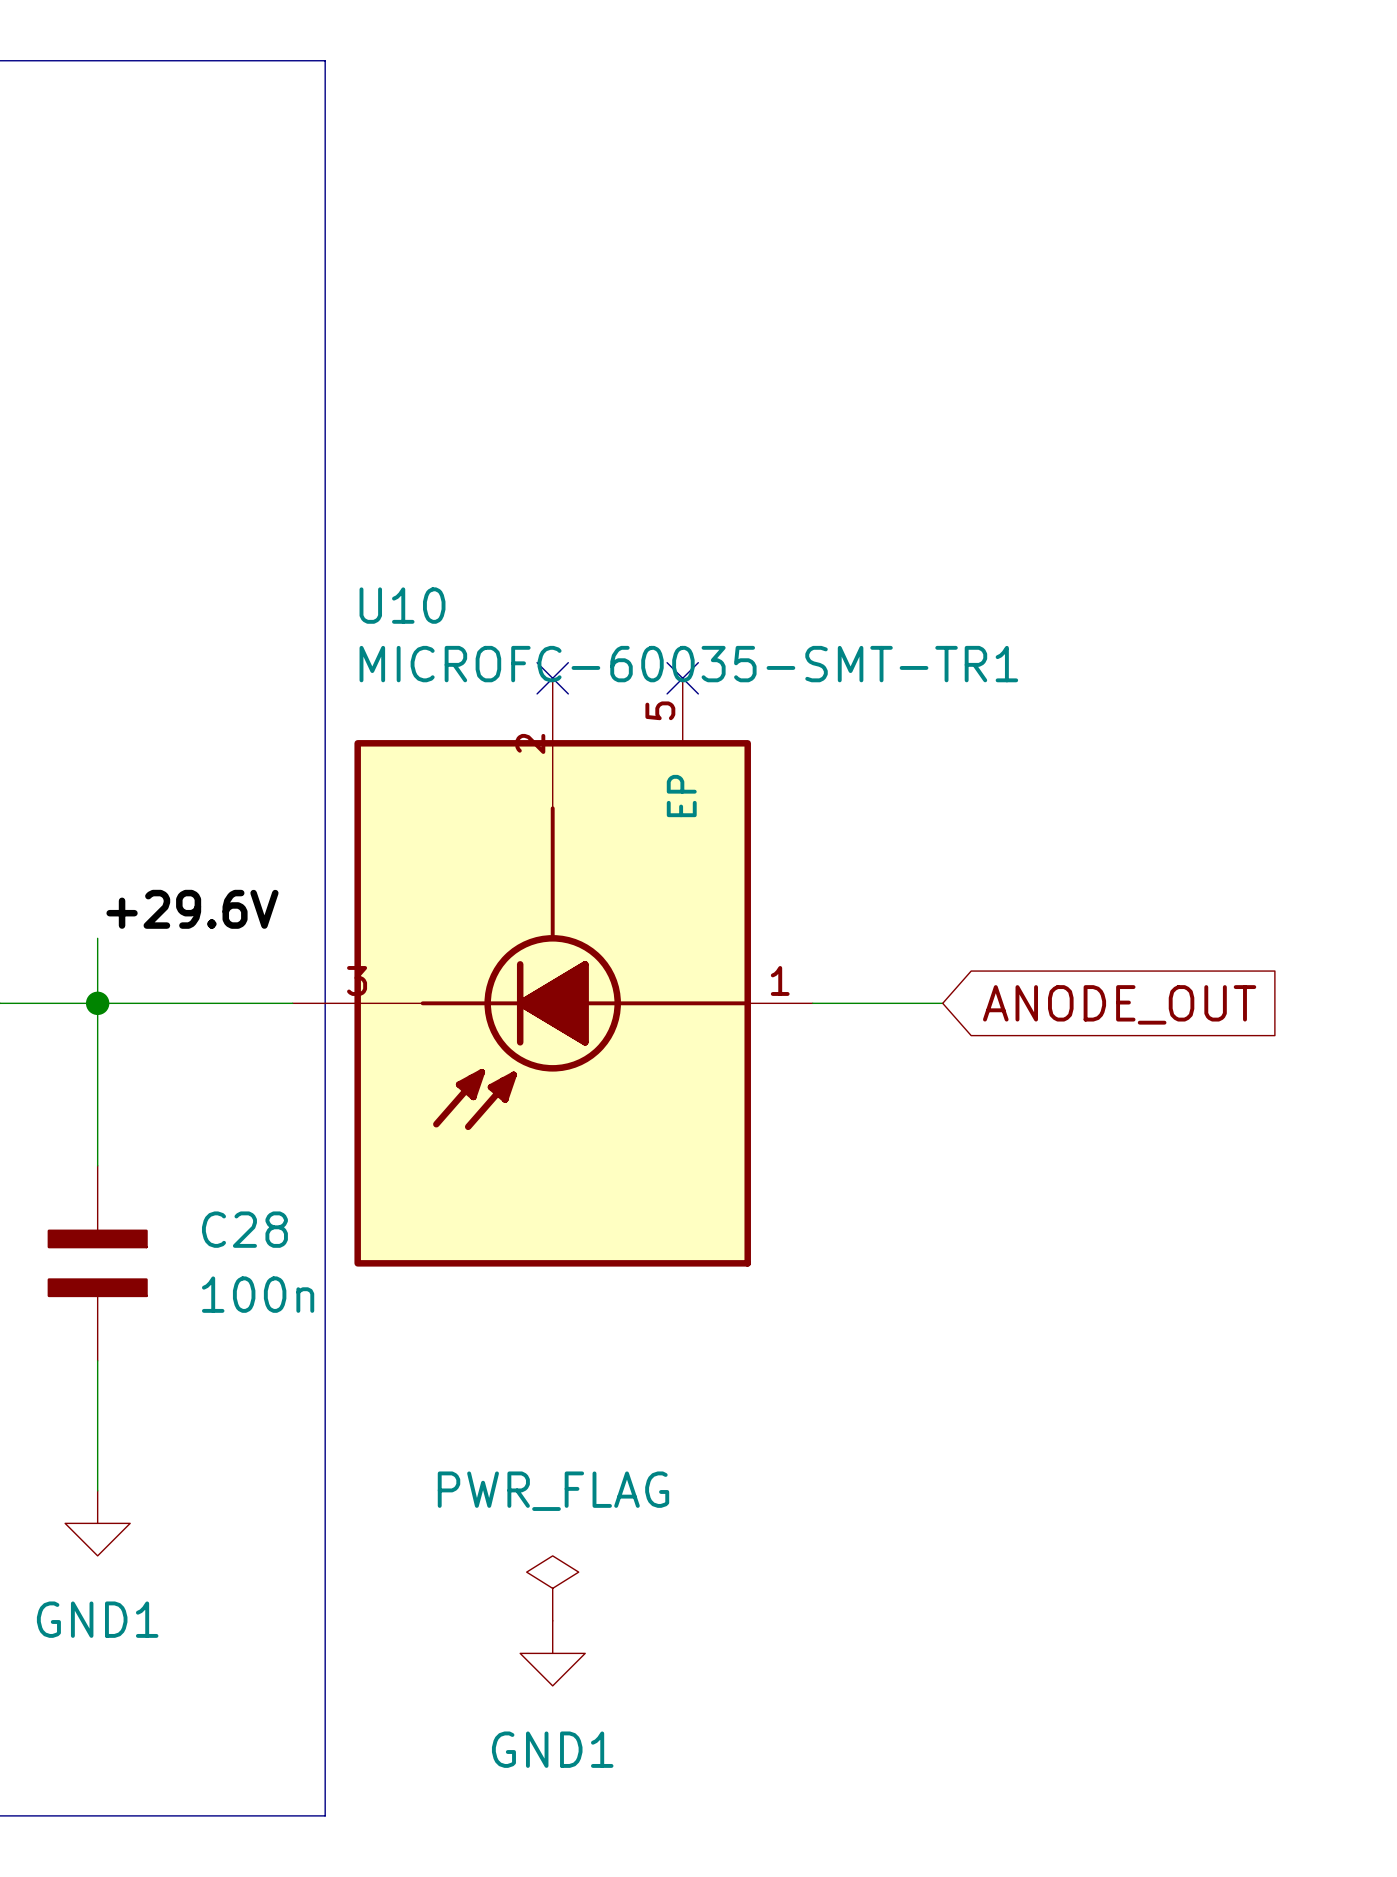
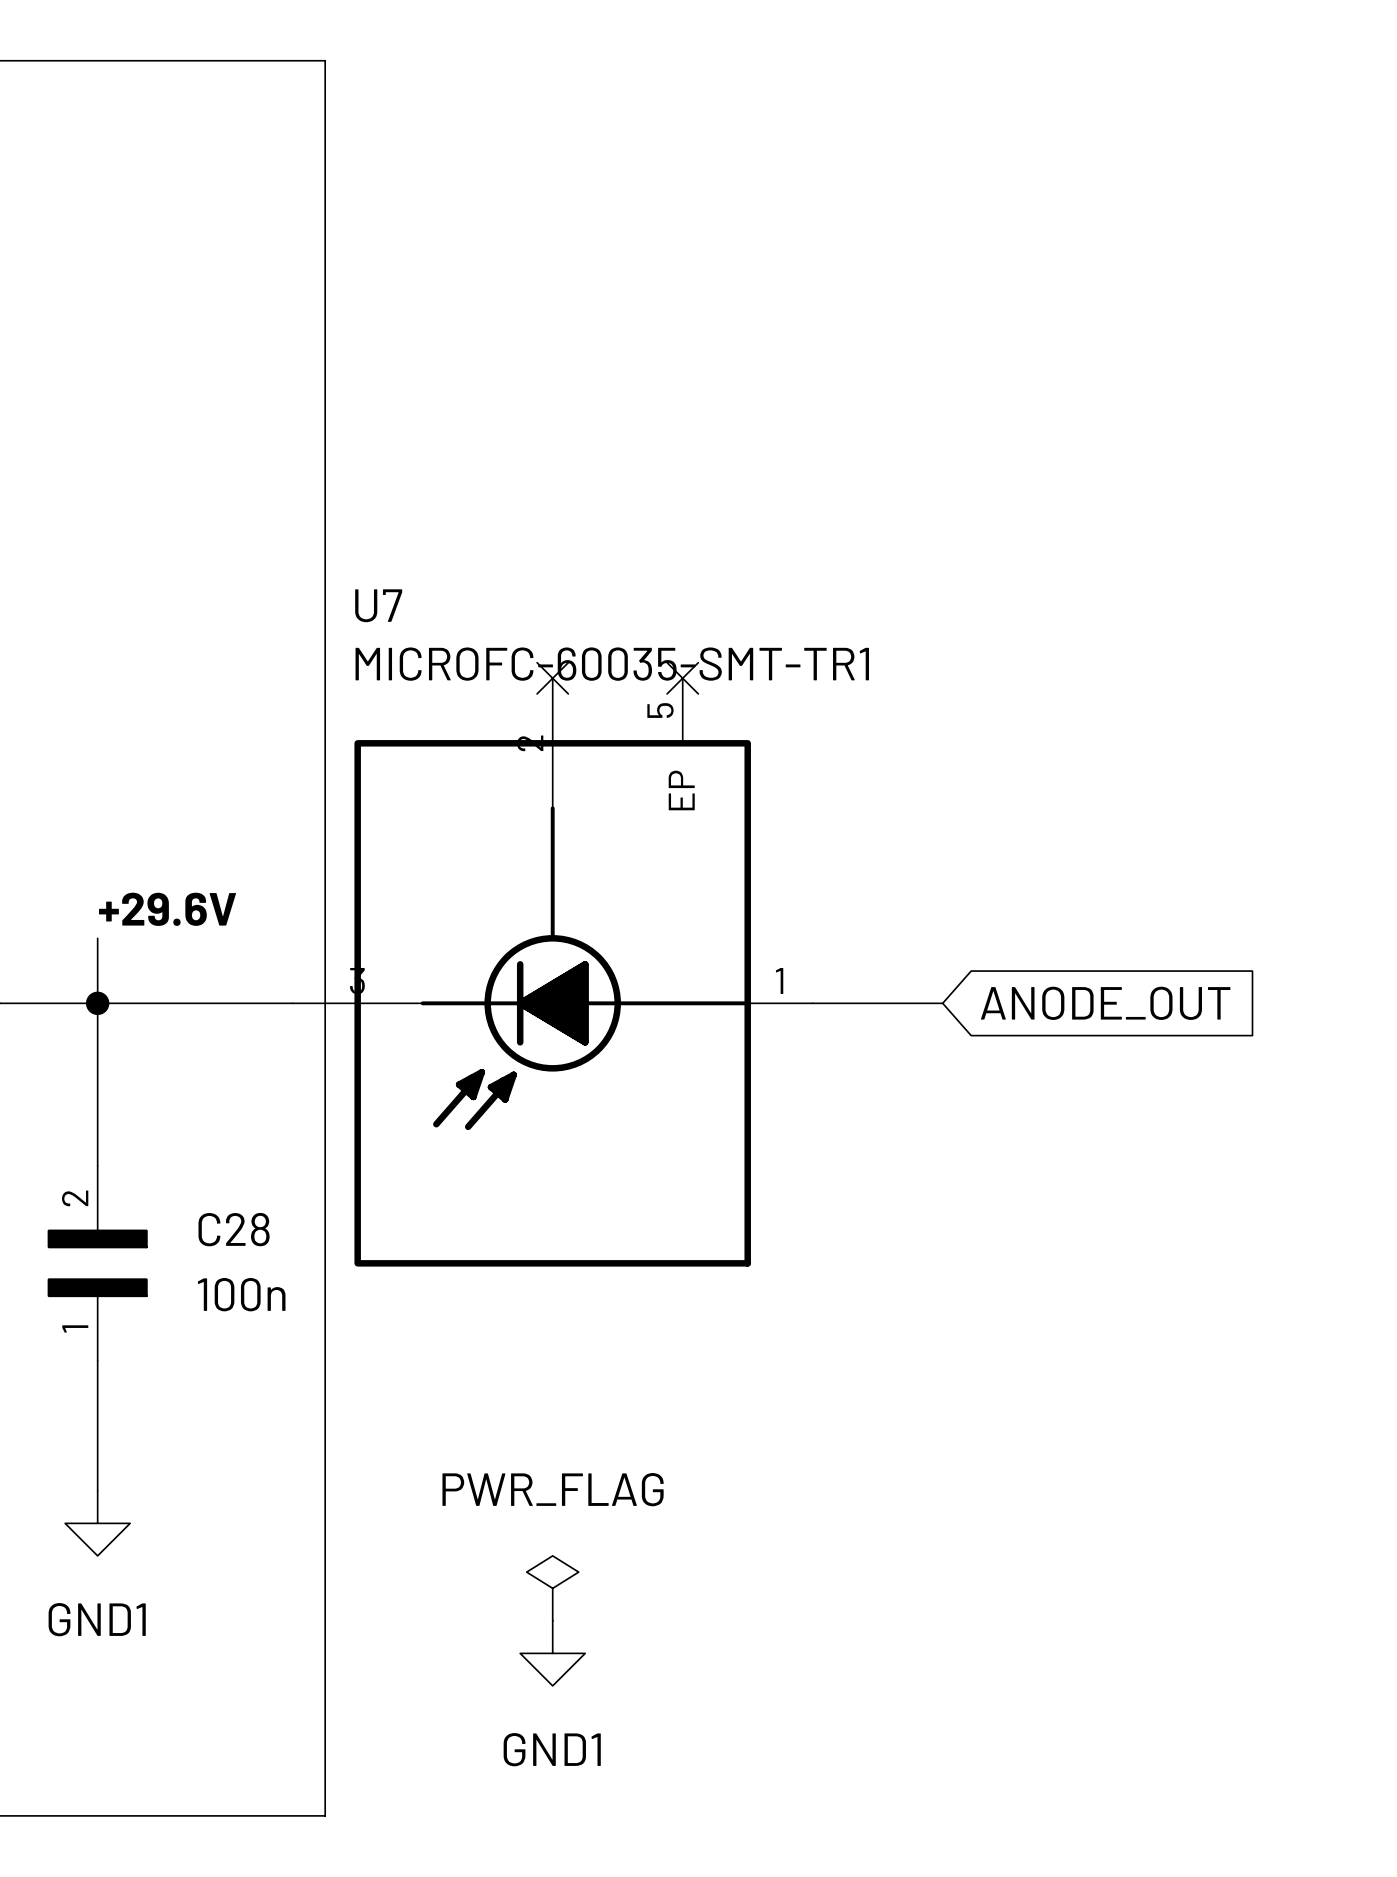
U10 name: U10 (402, 605) -> U7 (378, 605)
C28 pin number: none -> 2 (75, 1198)
C28 pin number: none -> 1 (75, 1329)

